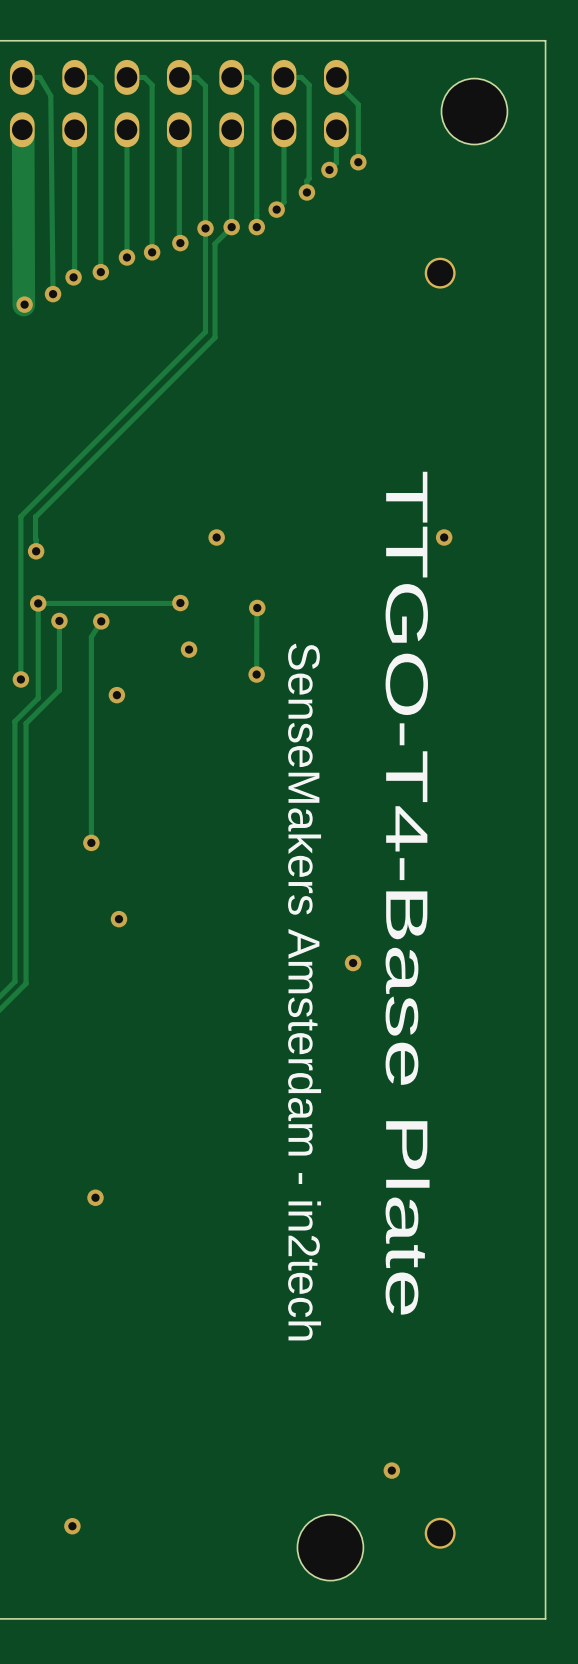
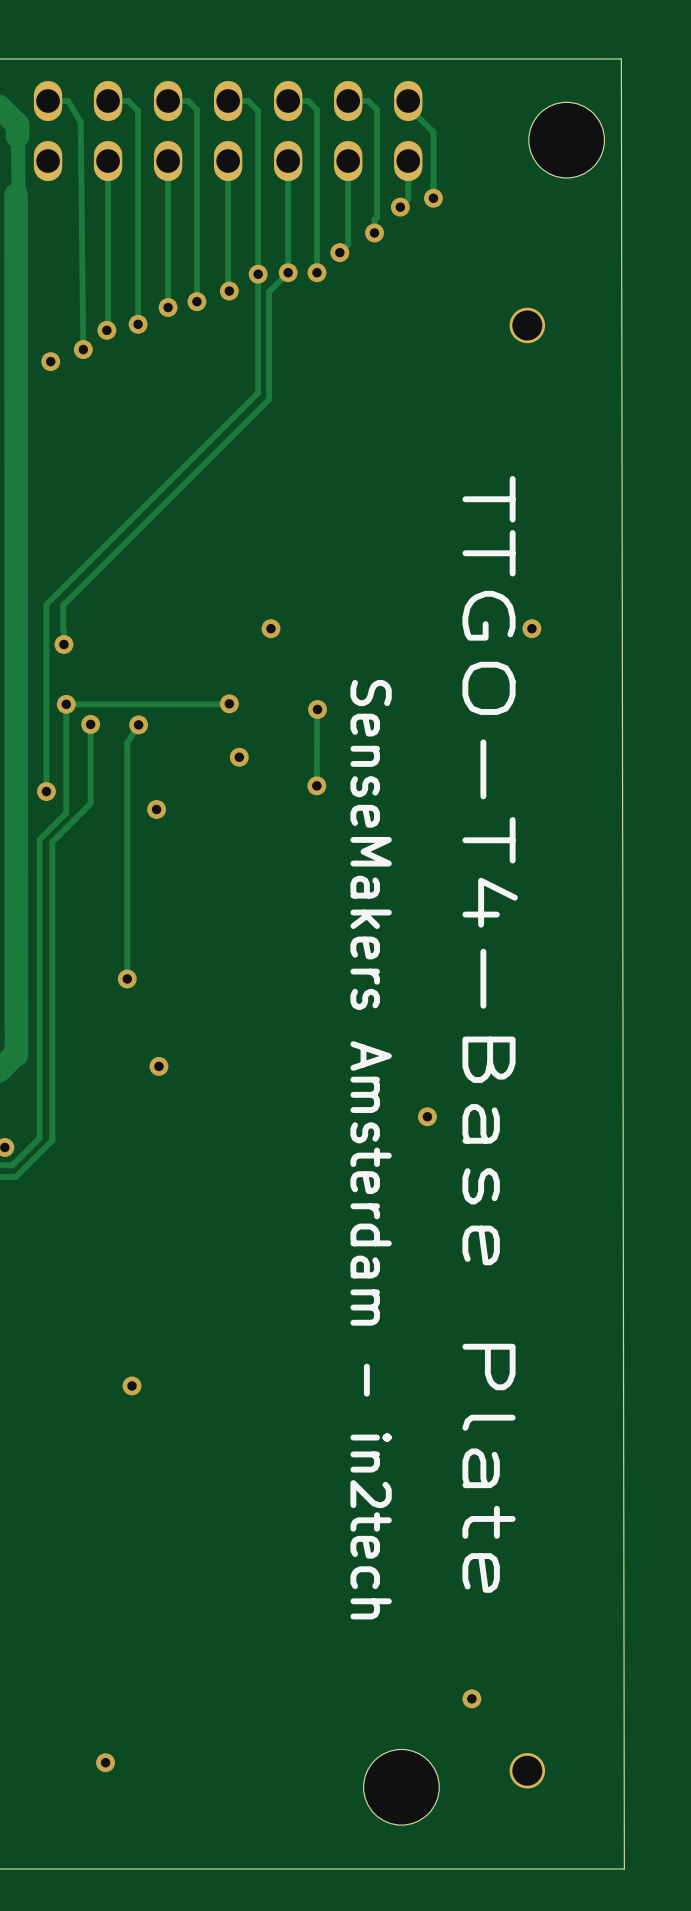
board edge: (522, 40) (545, 40) (545, 1618) (524, 1618) -> (621, 58) (624, 1868)
track: (23, 126) (23, 305) -> none

